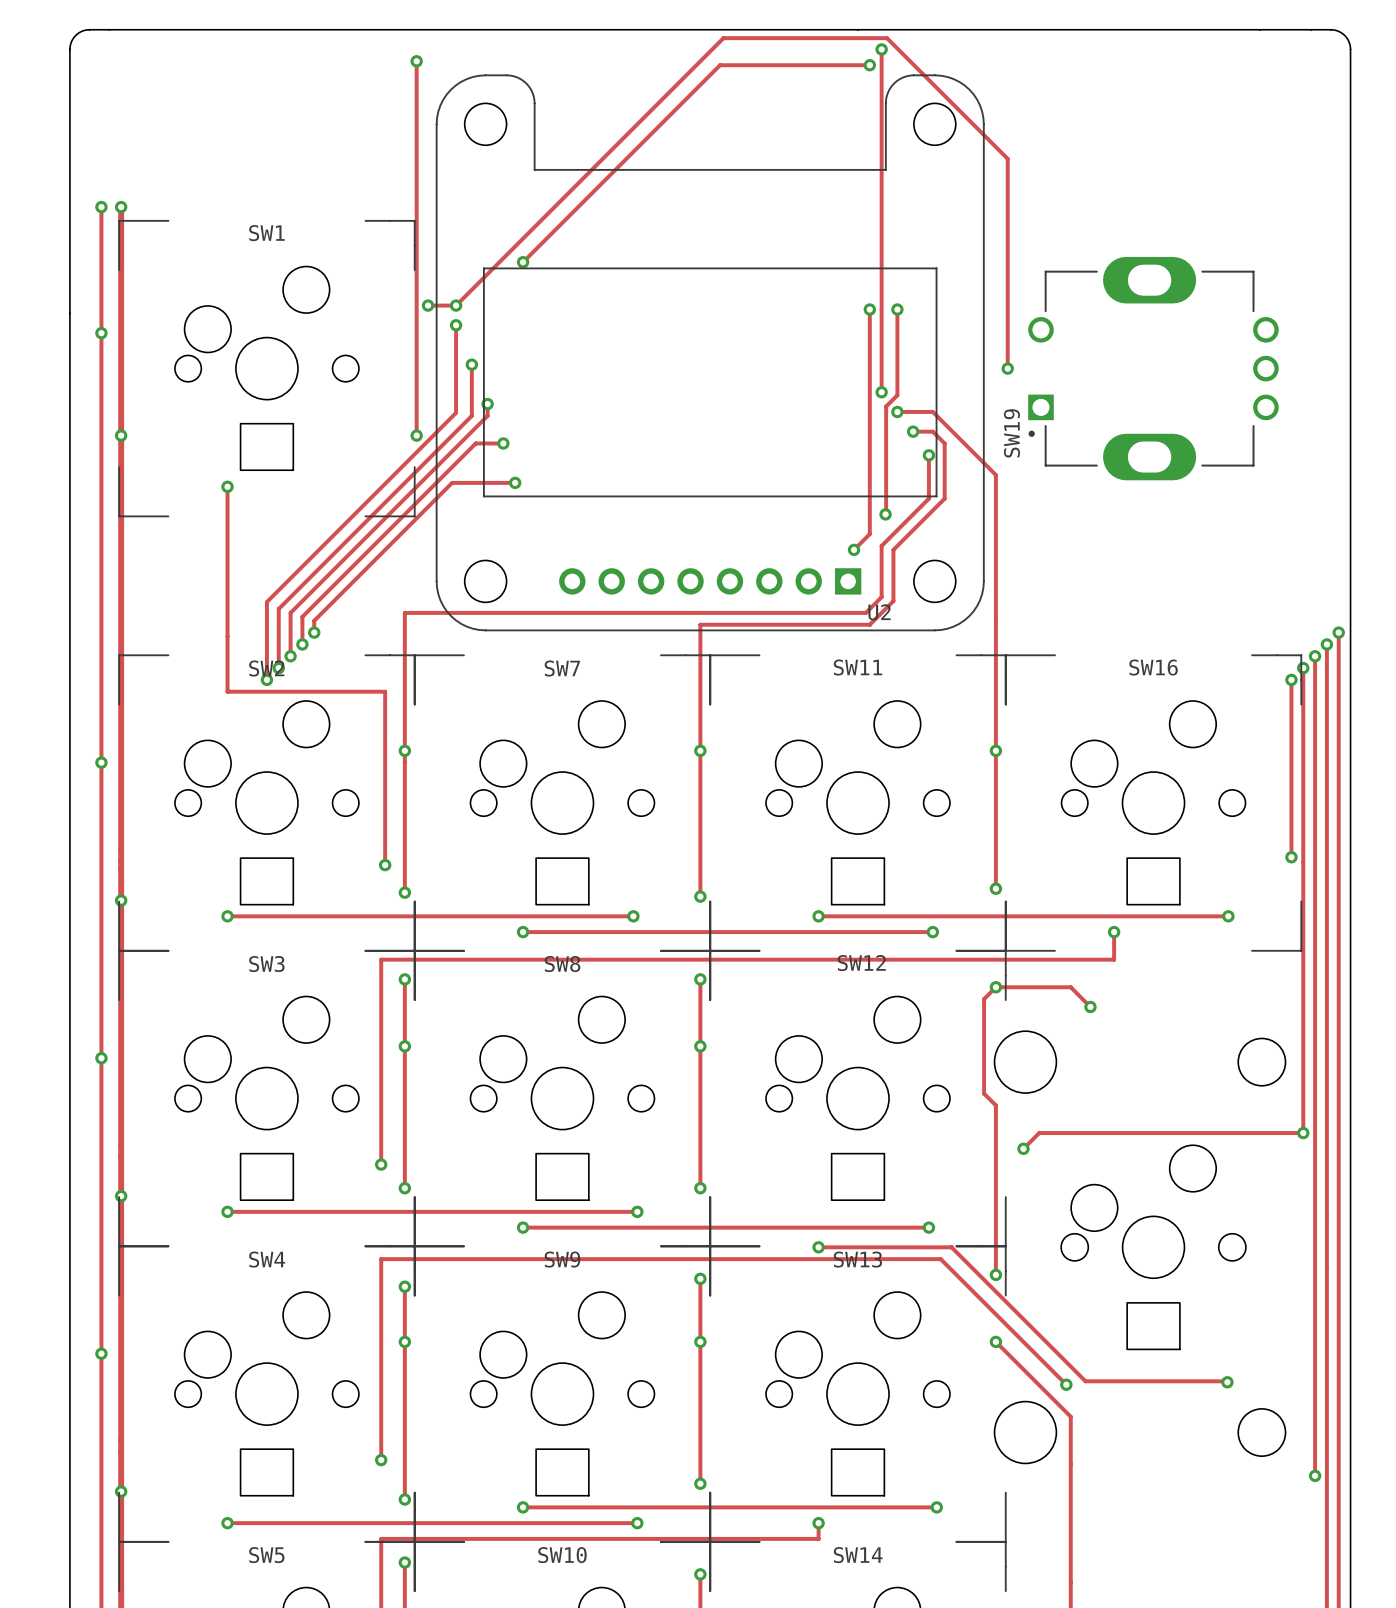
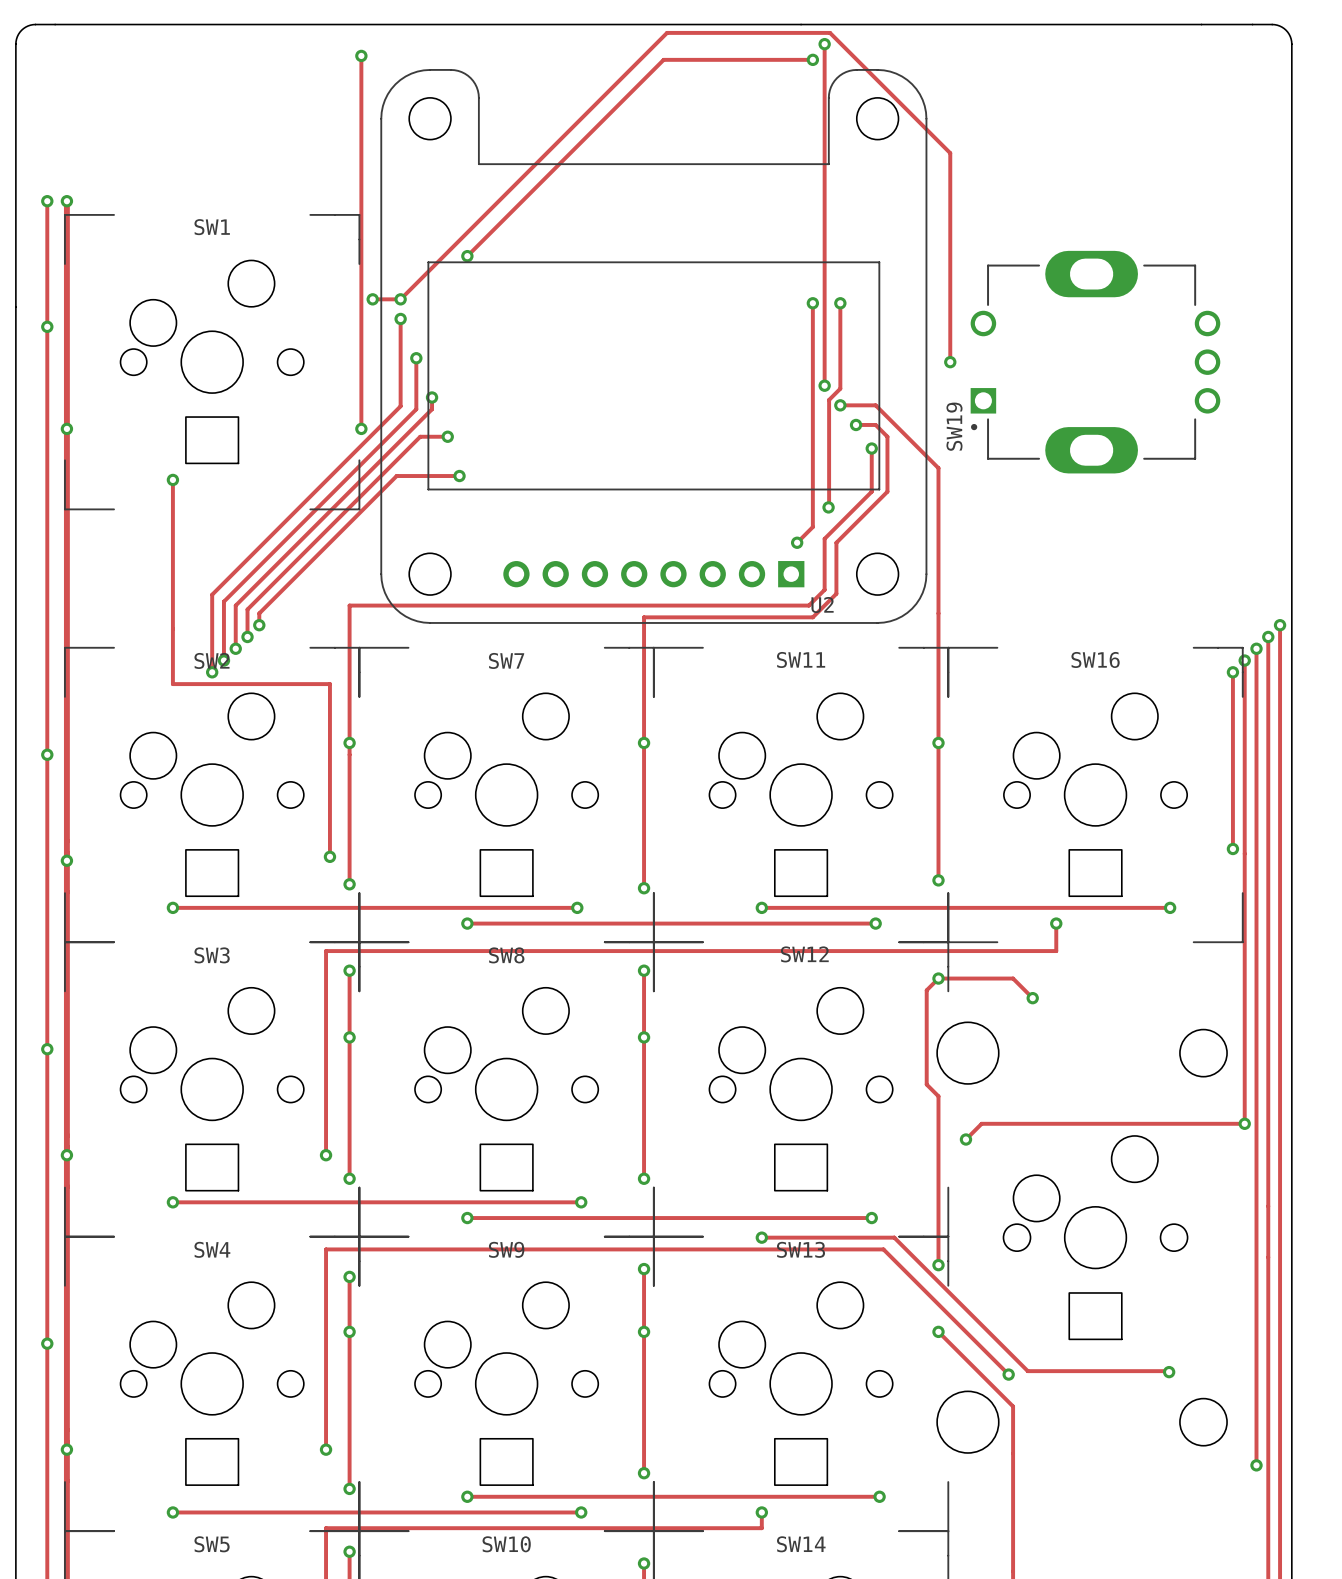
via position: (121, 900) -> (66, 860)
via position: (121, 1196) -> (66, 1155)
via position: (121, 1491) -> (66, 1449)

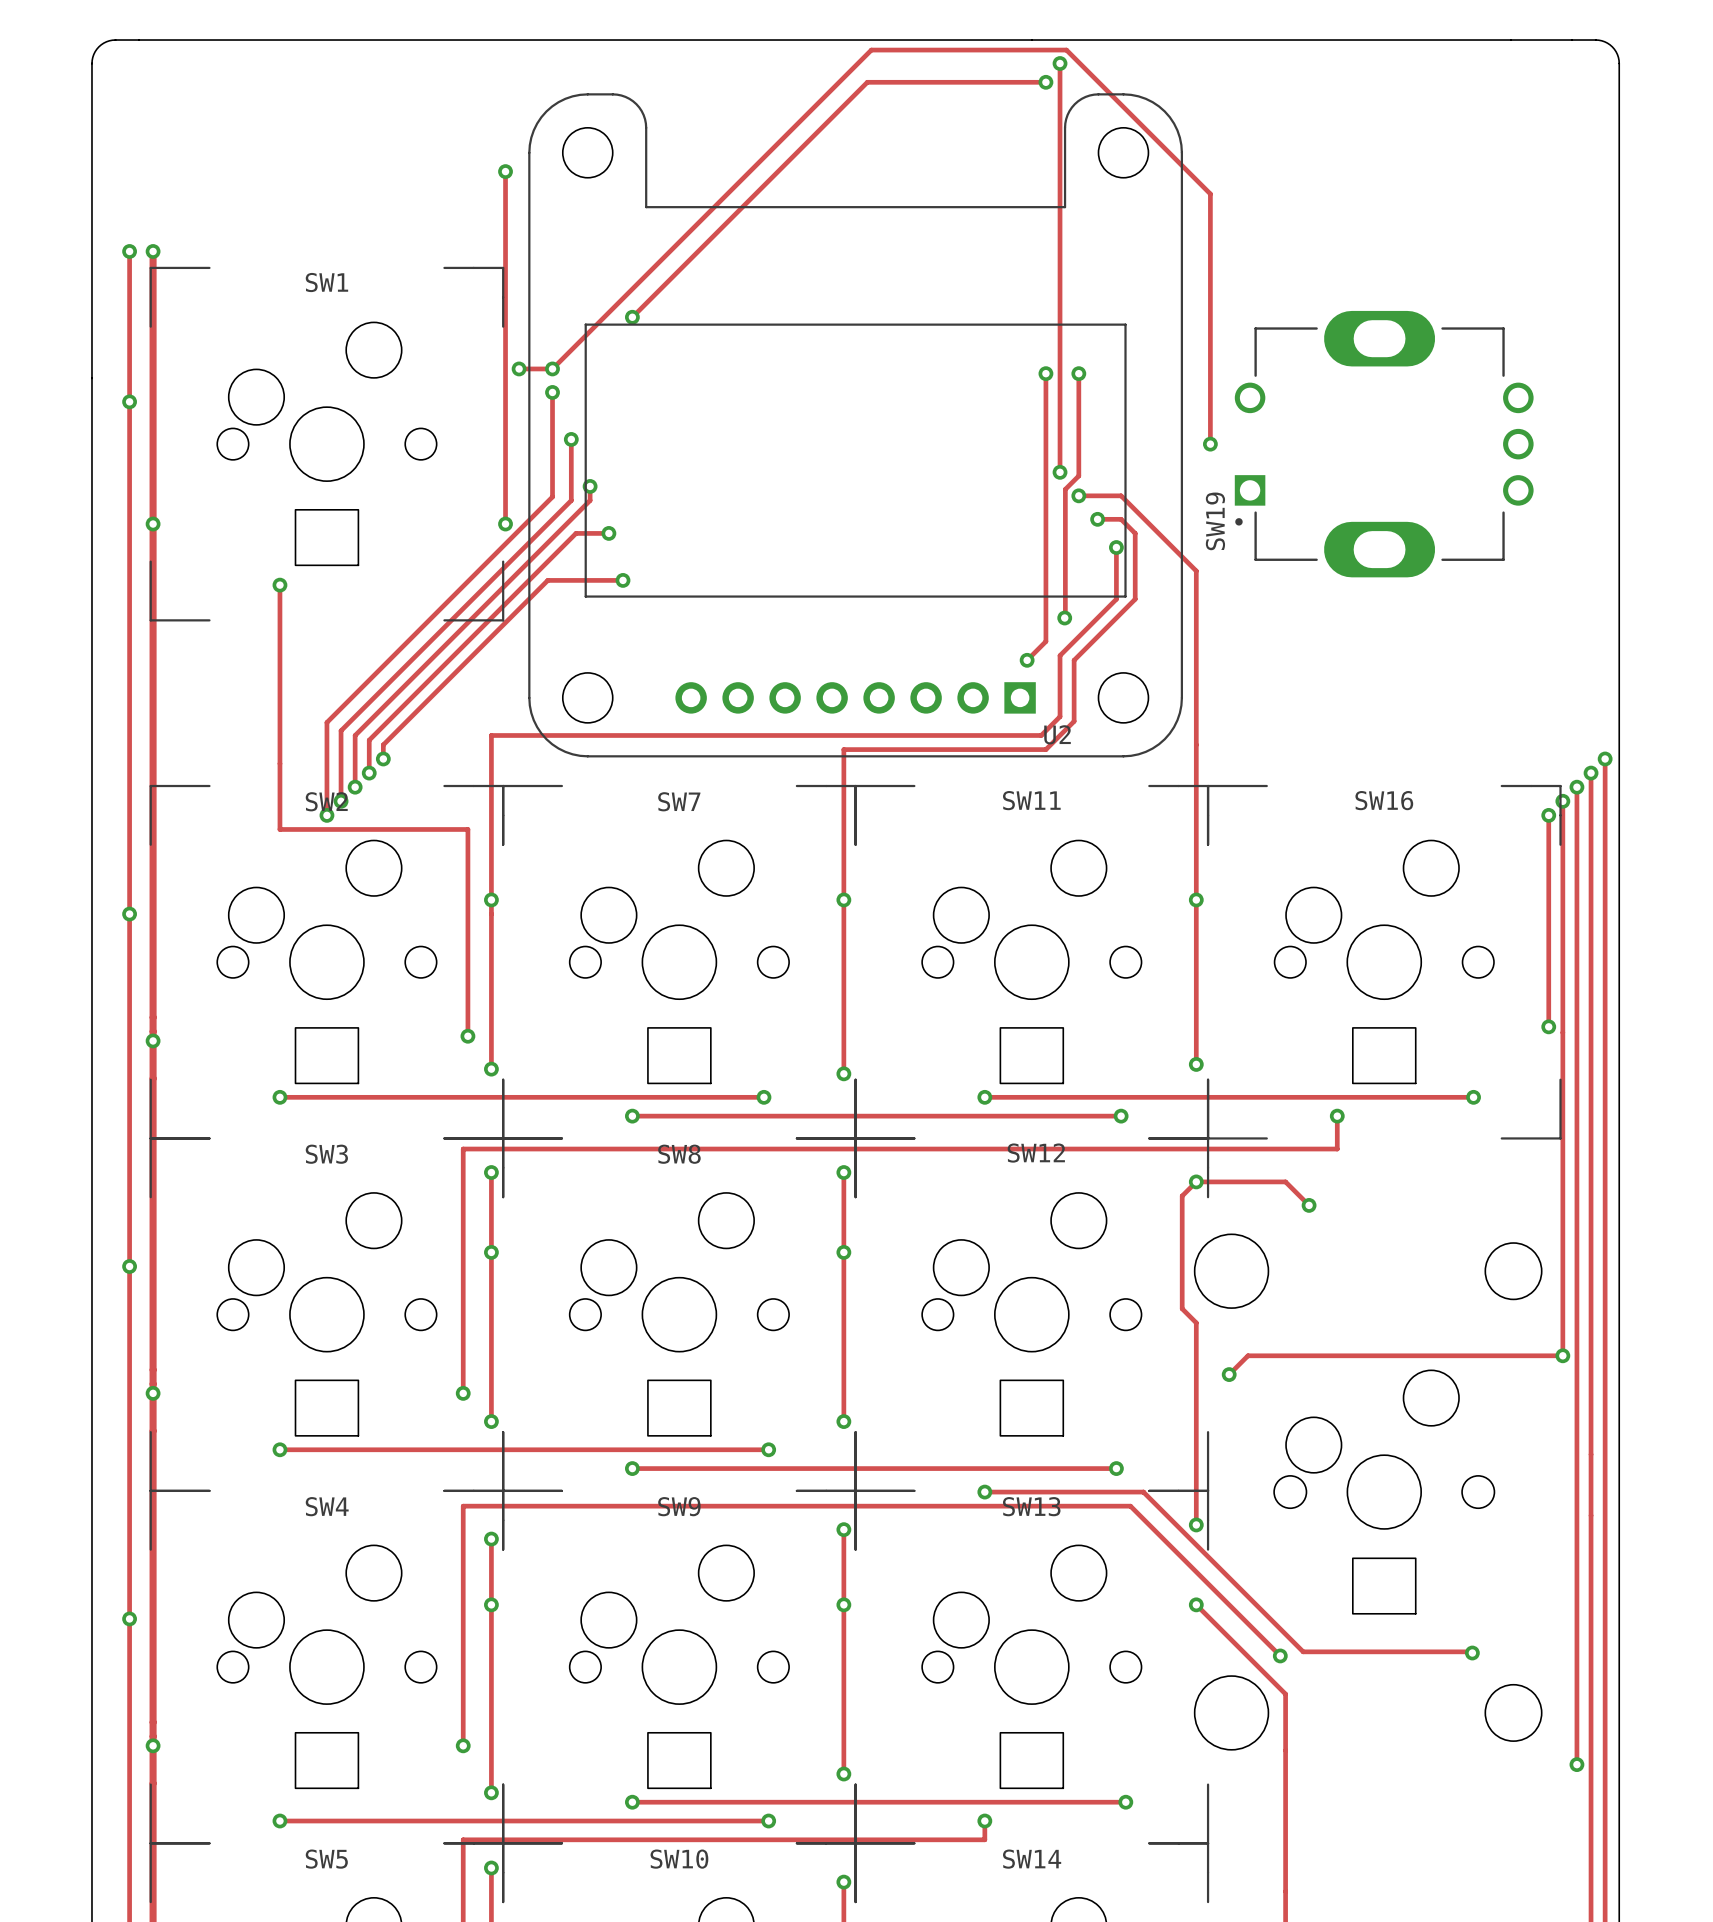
track: (361, 55) (361, 134) -> none
via position: (361, 55) -> (505, 171)

